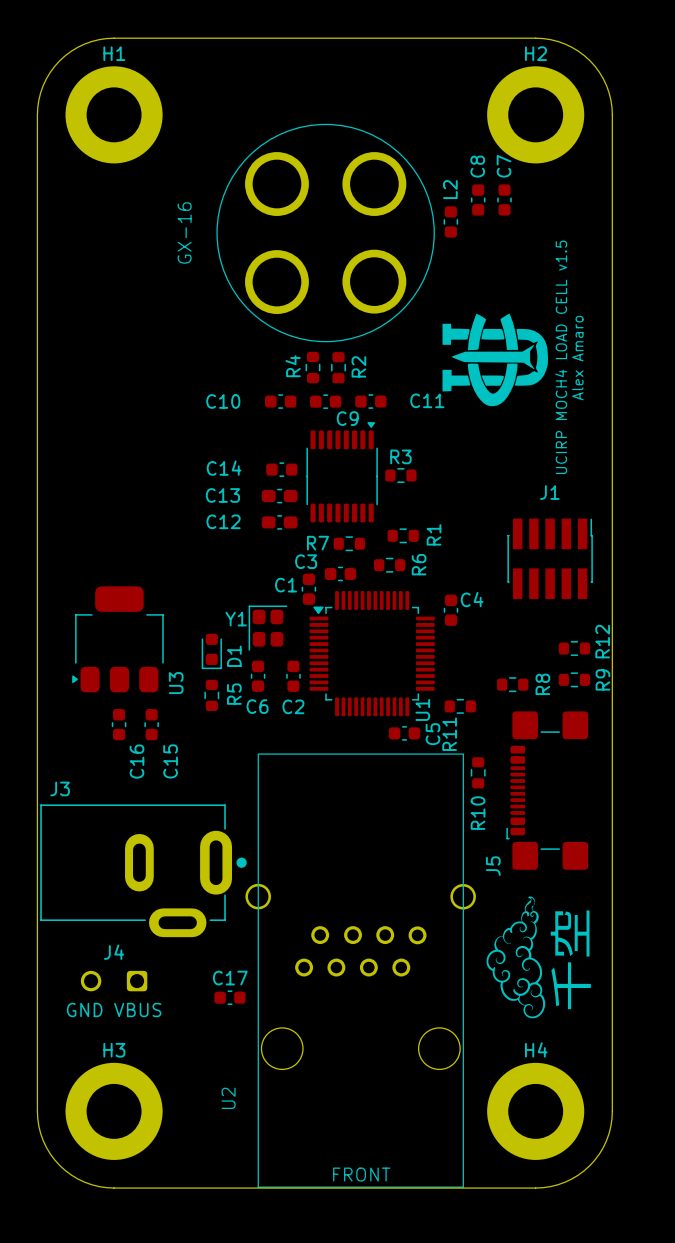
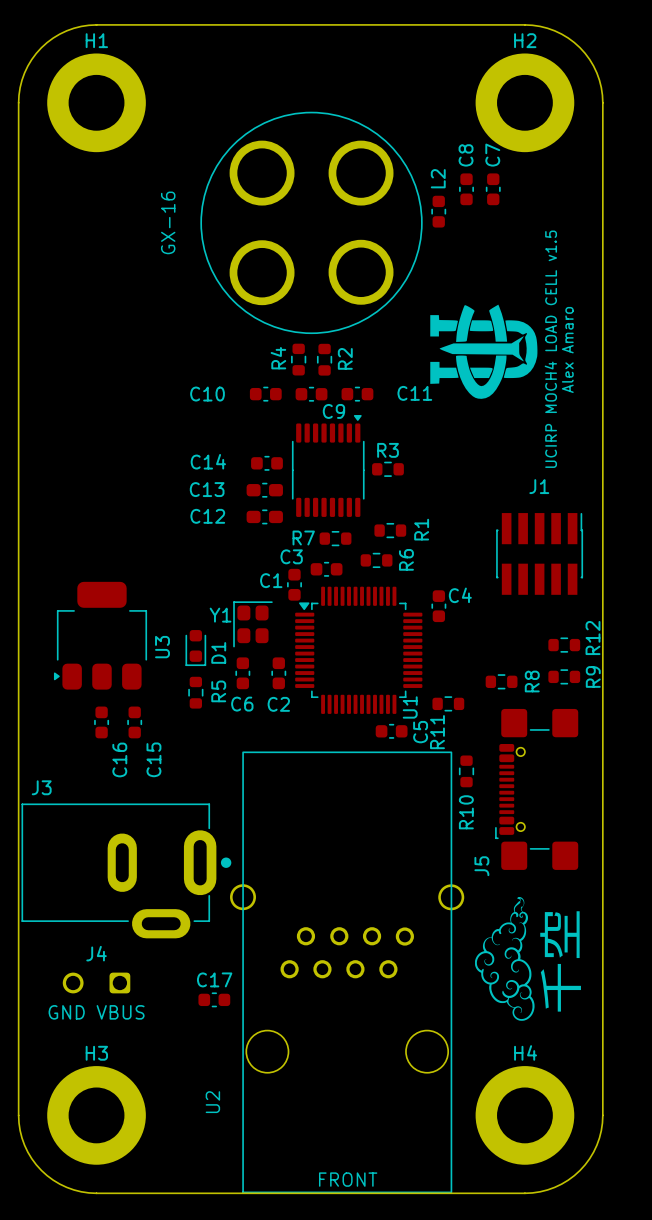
U3 name position: U3 (176, 683) -> U3 (162, 647)
J5 footprint: [506, 711, 589, 870] -> [495, 708, 579, 870]

